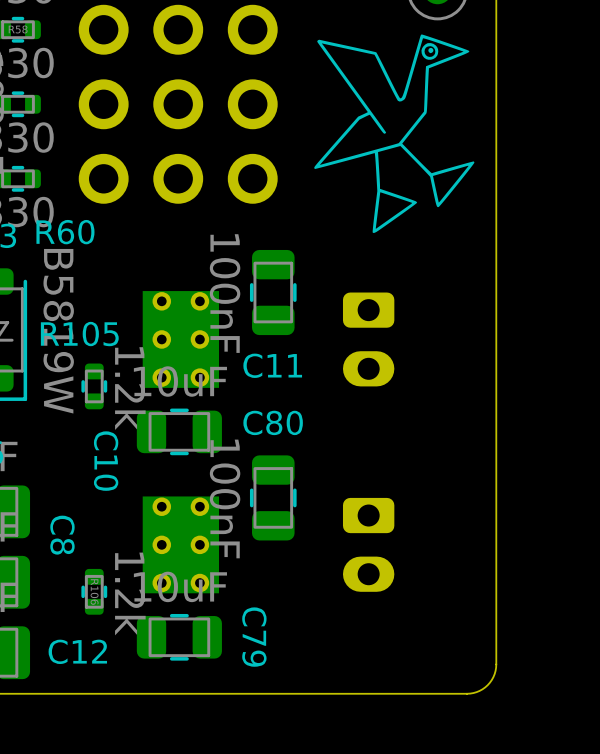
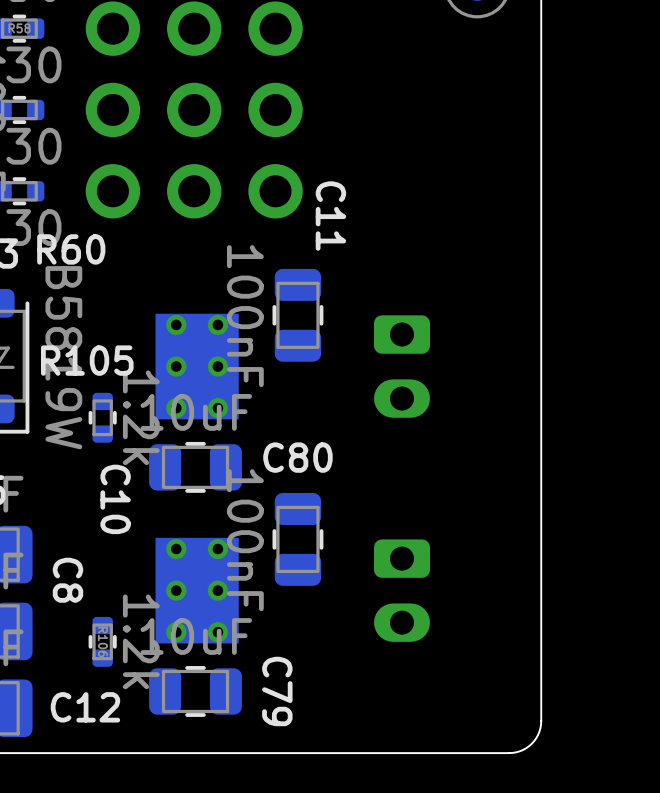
drawing: [314, 34, 475, 234] -> none
C11 name rotation: 0° (272, 365) -> 90° clockwise (330, 216)
C11 name position: C11 (272, 365) -> C11 (330, 216)

